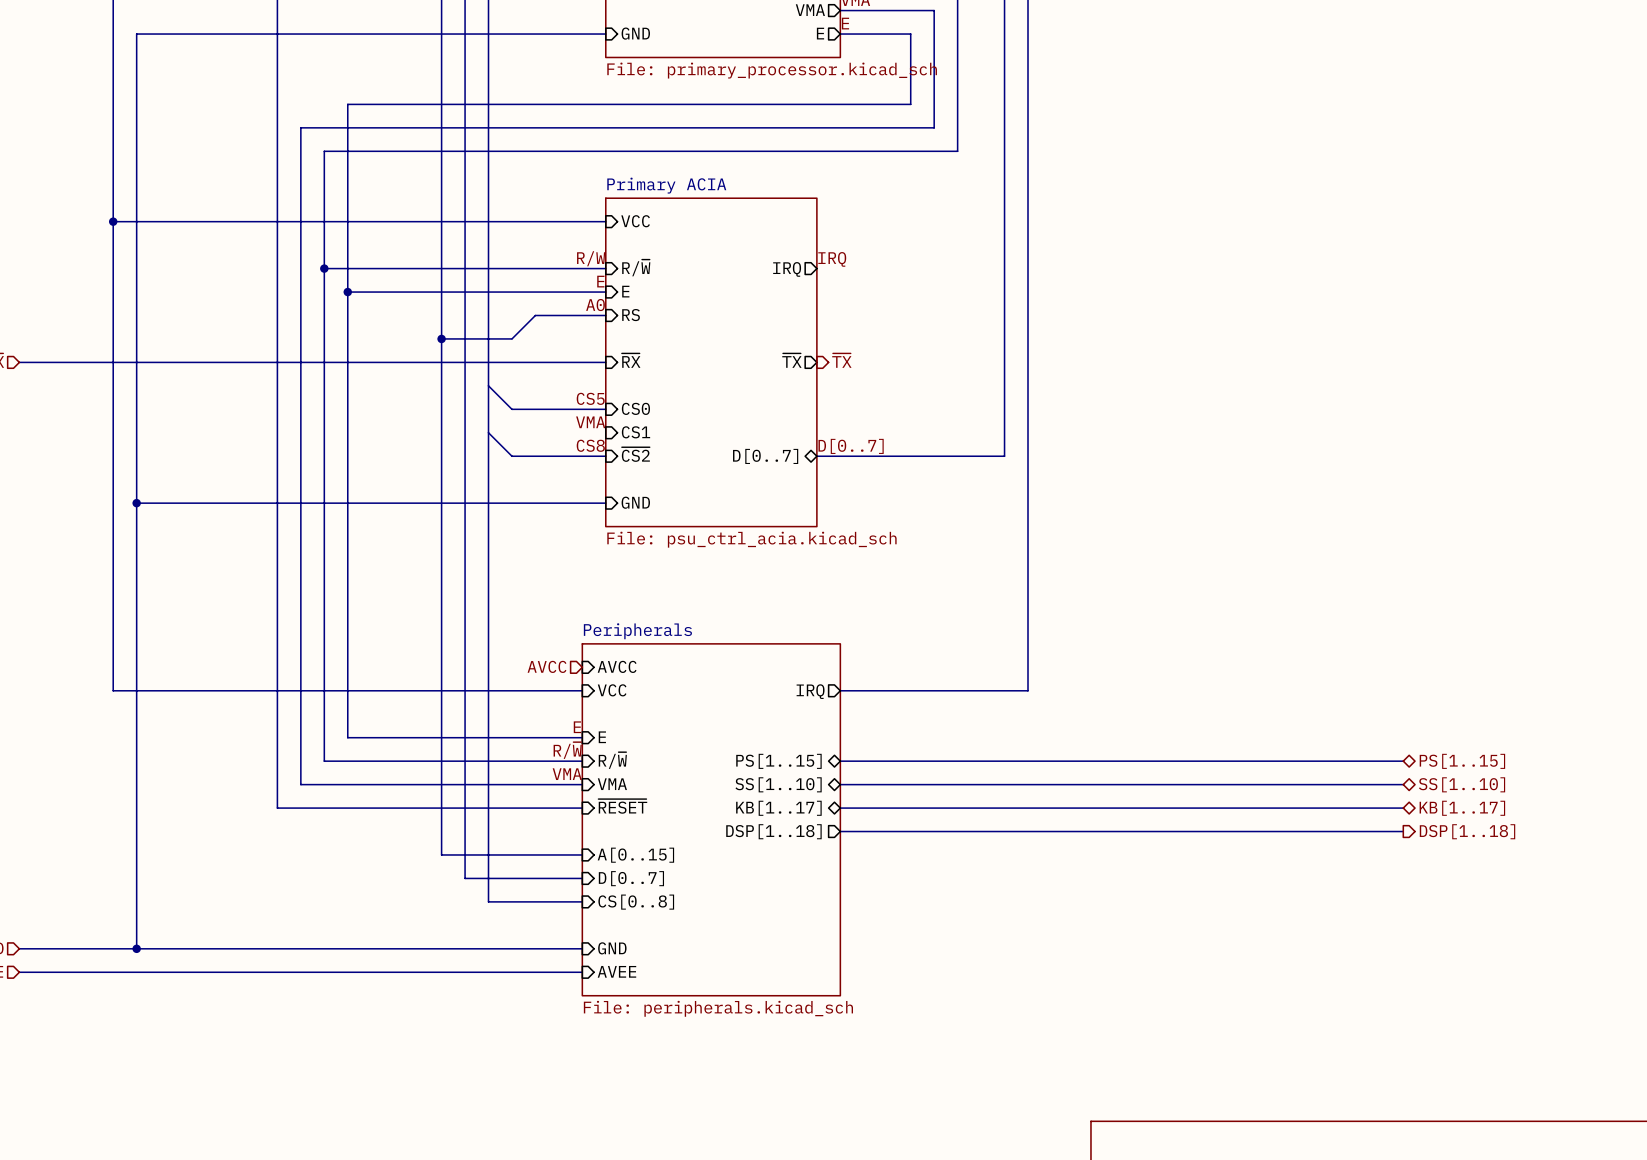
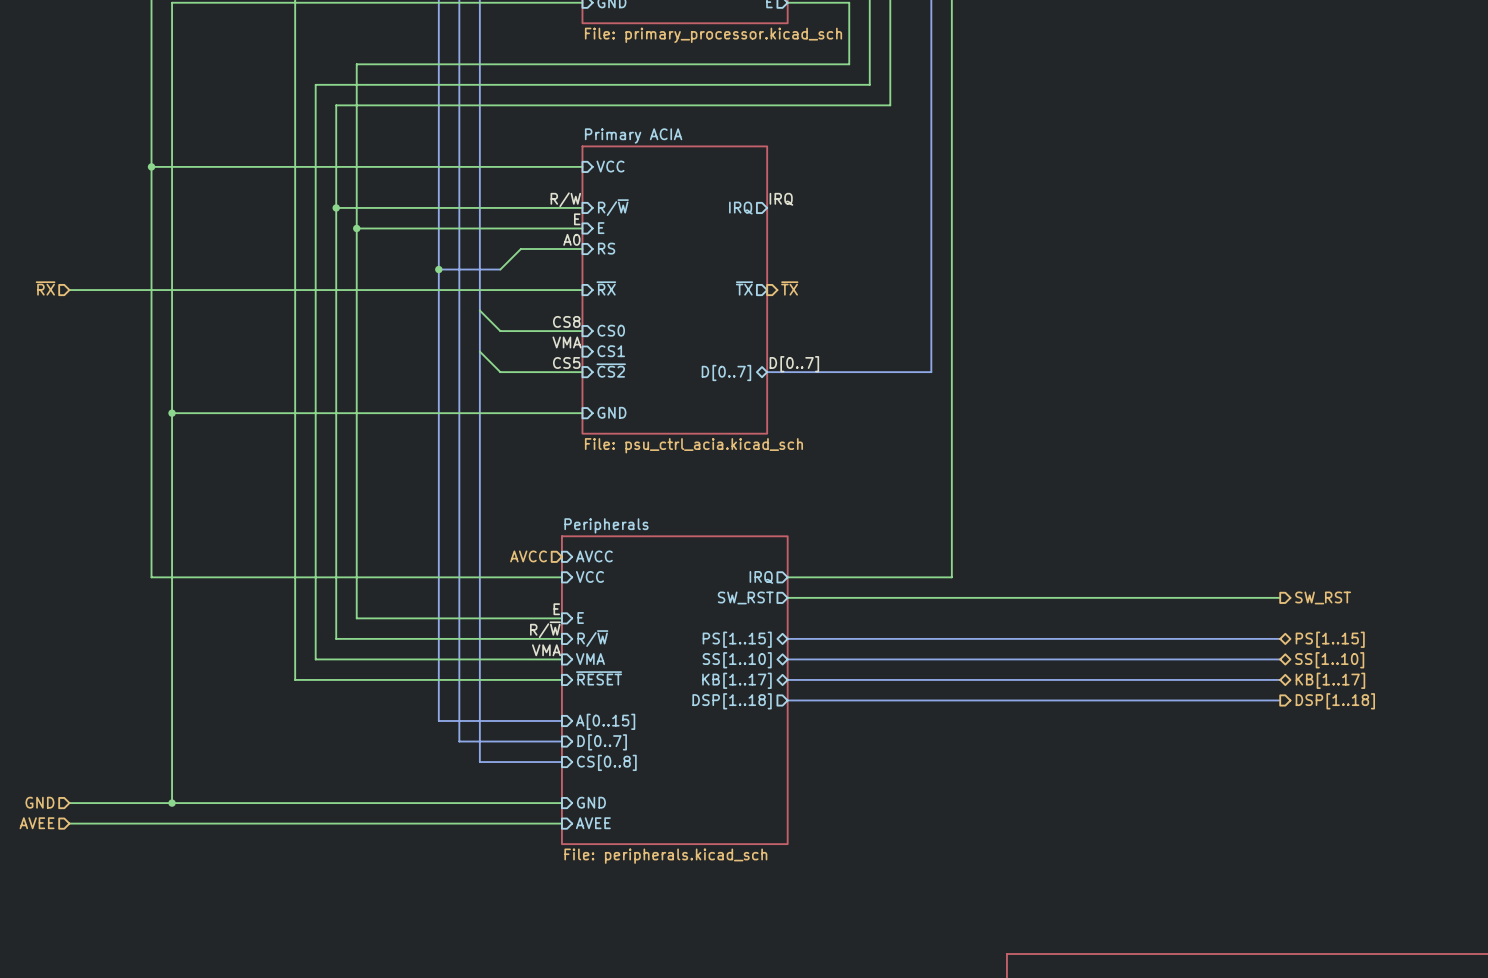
label: CS5 (590, 398) -> CS8 (566, 321)
label: CS8 (590, 445) -> CS5 (566, 362)
wire: none -> (787, 597) (1280, 597)
sheet pin: none -> SW_RST (745, 597)
hierarchical label: none -> SW_RST (1323, 597)

